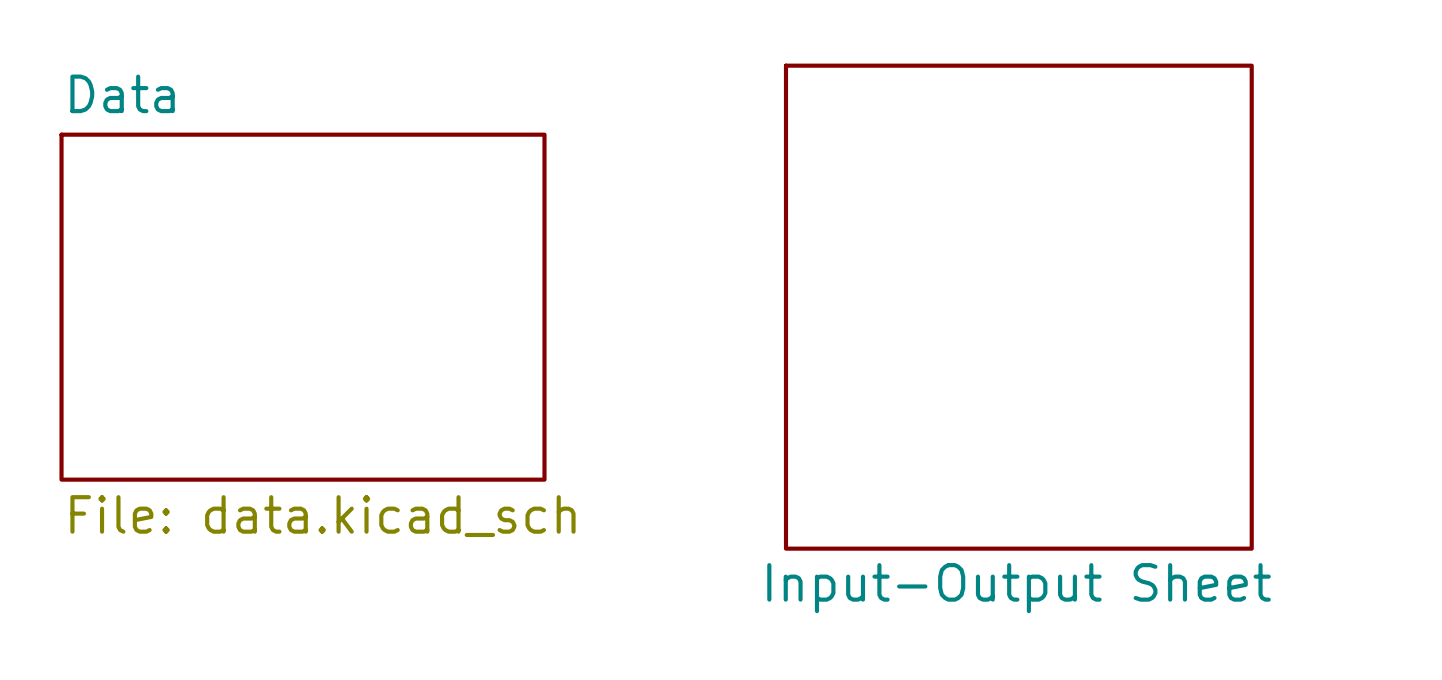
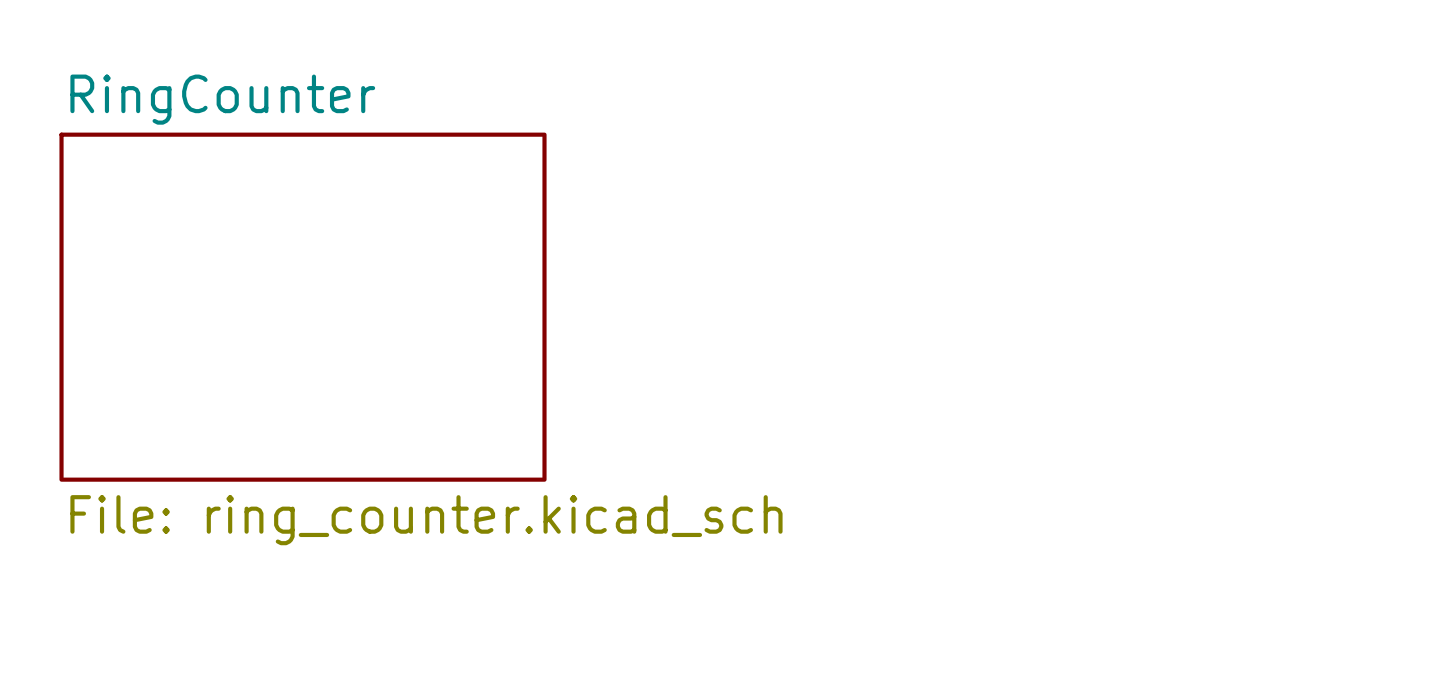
sheet Data name: Data (122, 93) -> RingCounter (222, 99)
sheet Input-Output Sheet: (1018, 307) -> none
sheet Data value: File: data.kicad_sch (322, 516) -> File: ring_counter.kicad_sch (426, 520)

